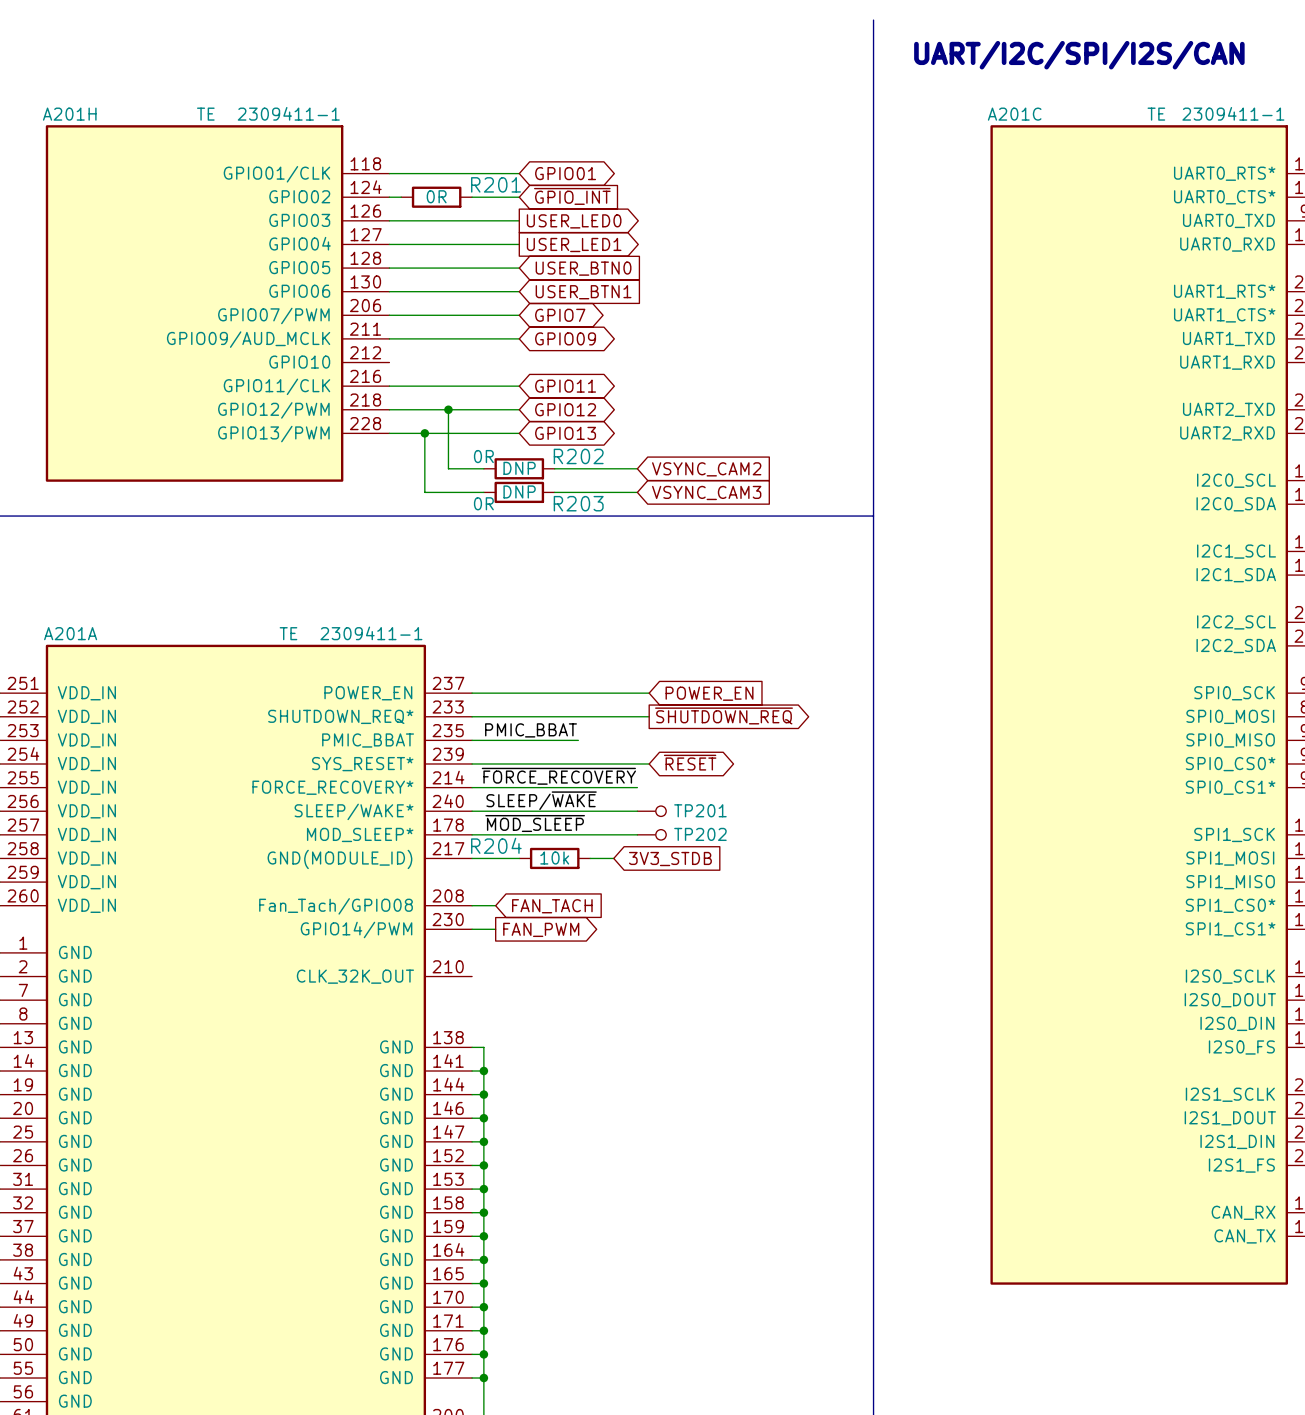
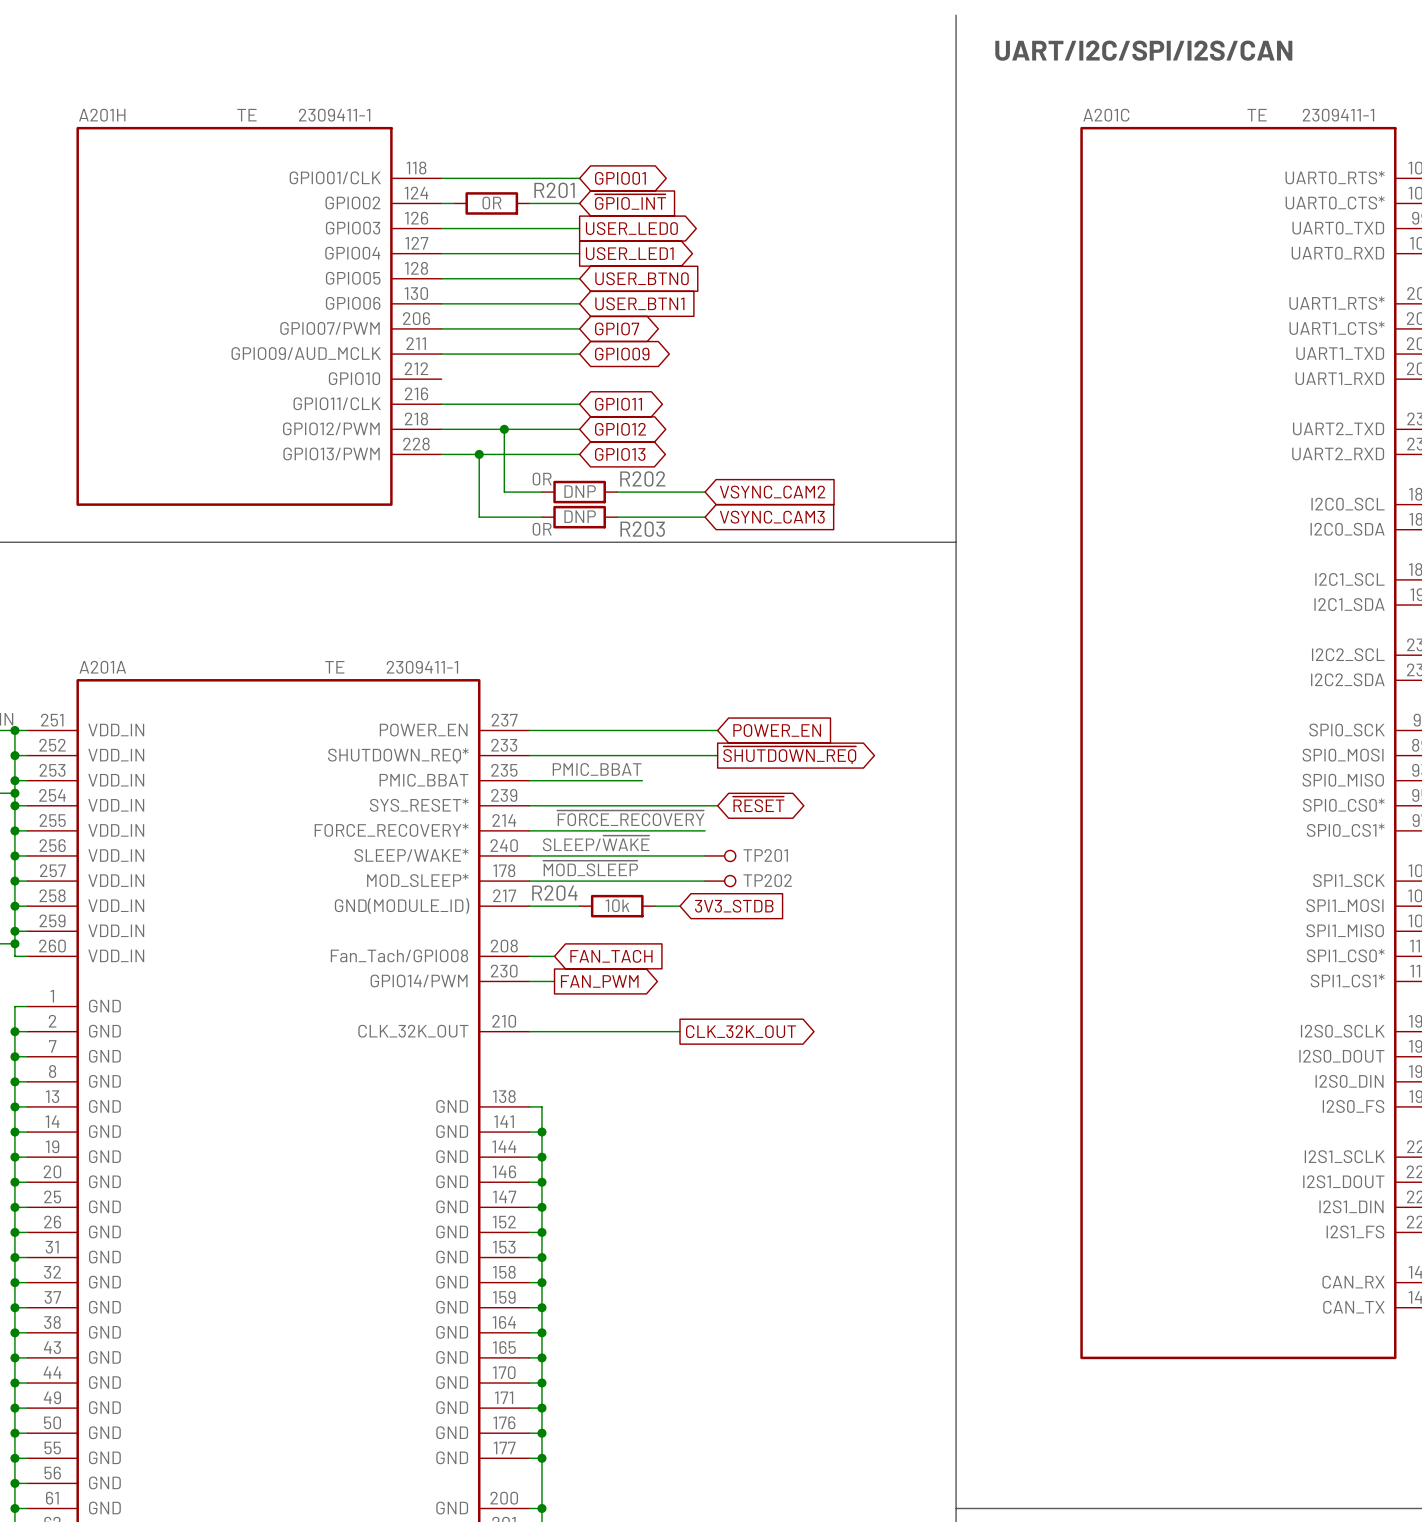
wire: none -> (529, 1031) (680, 1031)
global label: none -> CLK_32K_OUT (741, 1031)

